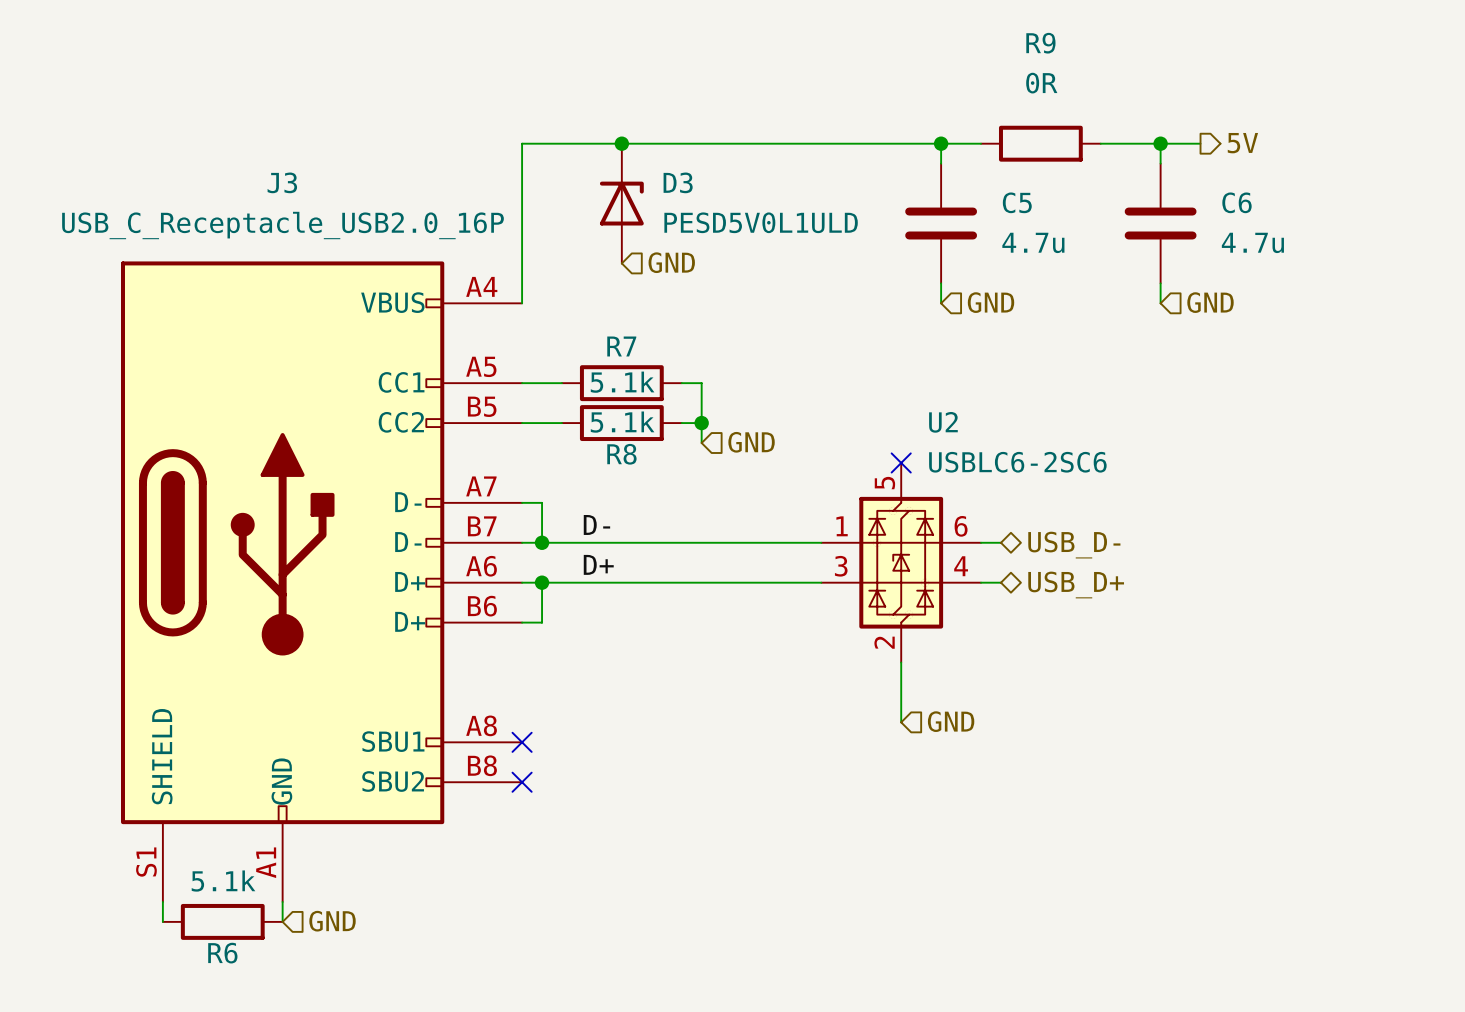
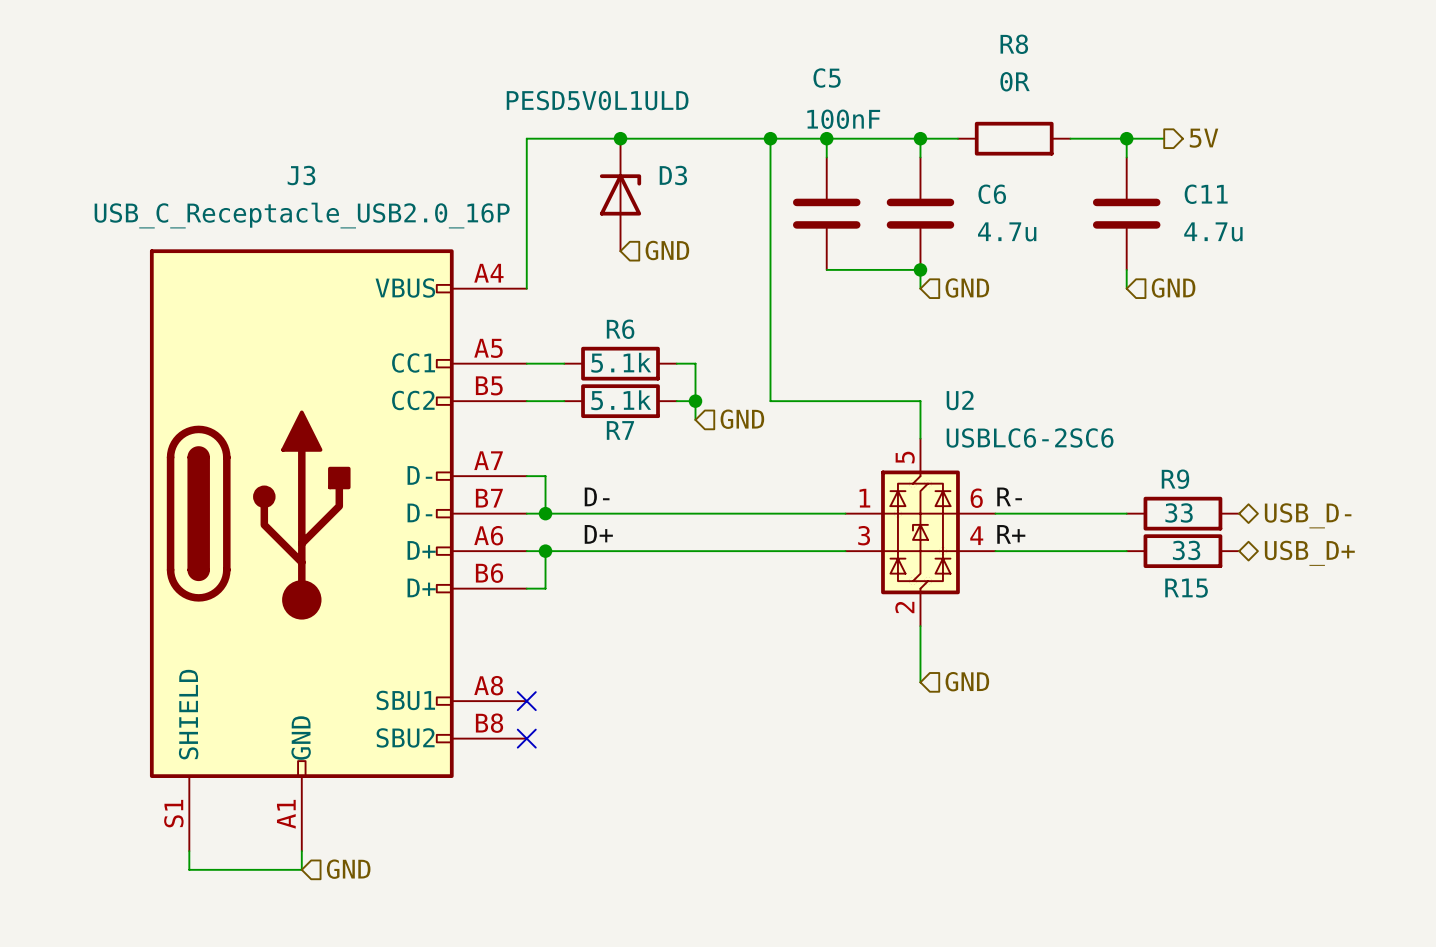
R9 name: R9 (1040, 43) -> R8 (1014, 44)
wire: none -> (770, 138) (770, 401) (920, 401) (920, 438)
junction: none -> (770, 138)
wire: none -> (826, 138) (826, 157)
junction: none -> (826, 138)
C5 name: C5 (1017, 202) -> C6 (992, 194)
C6 name: C6 (1236, 202) -> C11 (1206, 194)
D3 value position: PESD5V0L1ULD (761, 222) -> PESD5V0L1ULD (597, 100)
C5: none -> 100nF (826, 213)
wire: none -> (826, 269) (920, 269)
junction: none -> (920, 269)
R7 name: R7 (621, 346) -> R6 (620, 329)
R8 name: R8 (621, 454) -> R7 (620, 430)
no-connect mark: (901, 462) -> none
label: none -> R- (1009, 496)
wire: none -> (995, 513) (1126, 513)
R9: none -> 33 (1182, 513)
hierarchical label position: USB_D- (1074, 545) -> USB_D- (1308, 515)
U2 position: (901, 562) -> (920, 532)
label: none -> R+ (1011, 534)
wire: none -> (995, 551) (1126, 551)
R15: none -> 33 (1182, 551)
hierarchical label position: USB_D+ (1076, 584) -> USB_D+ (1309, 553)
wire: (901, 662) (901, 722) -> (920, 626) (920, 682)
hierarchical label position: GND (951, 721) -> GND (967, 681)
wire: none -> (189, 869) (301, 869)
R6: 5.1k (222, 921) -> none

